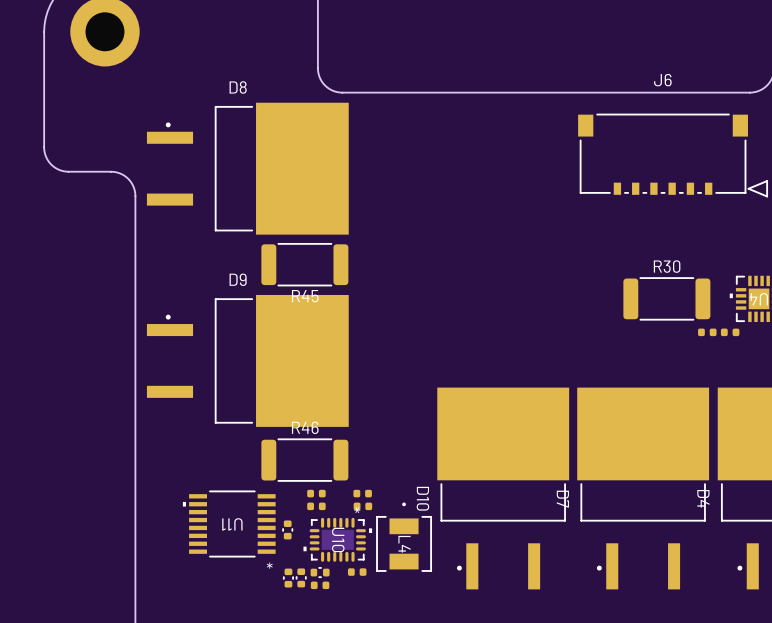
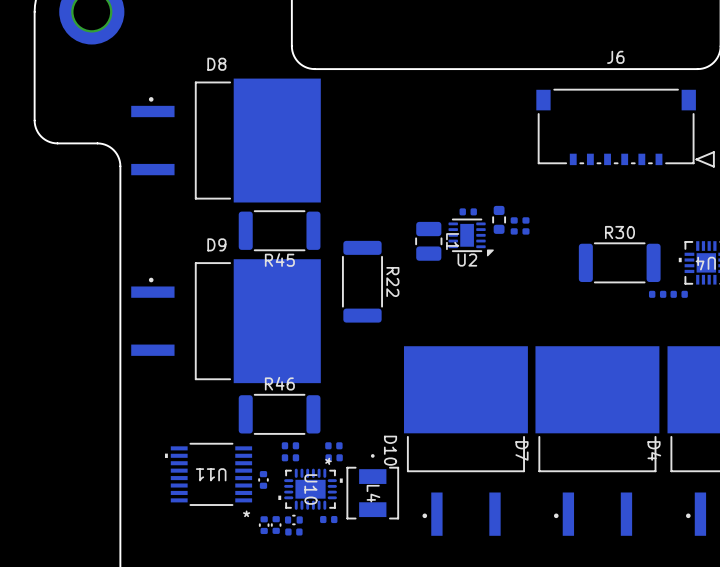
part: none -> (468, 211)
part: none -> (499, 219)
part: none -> (514, 225)
part: none -> (525, 225)
U2: none -> (471, 237)
L1: none -> (428, 241)
R22: none -> (362, 281)

